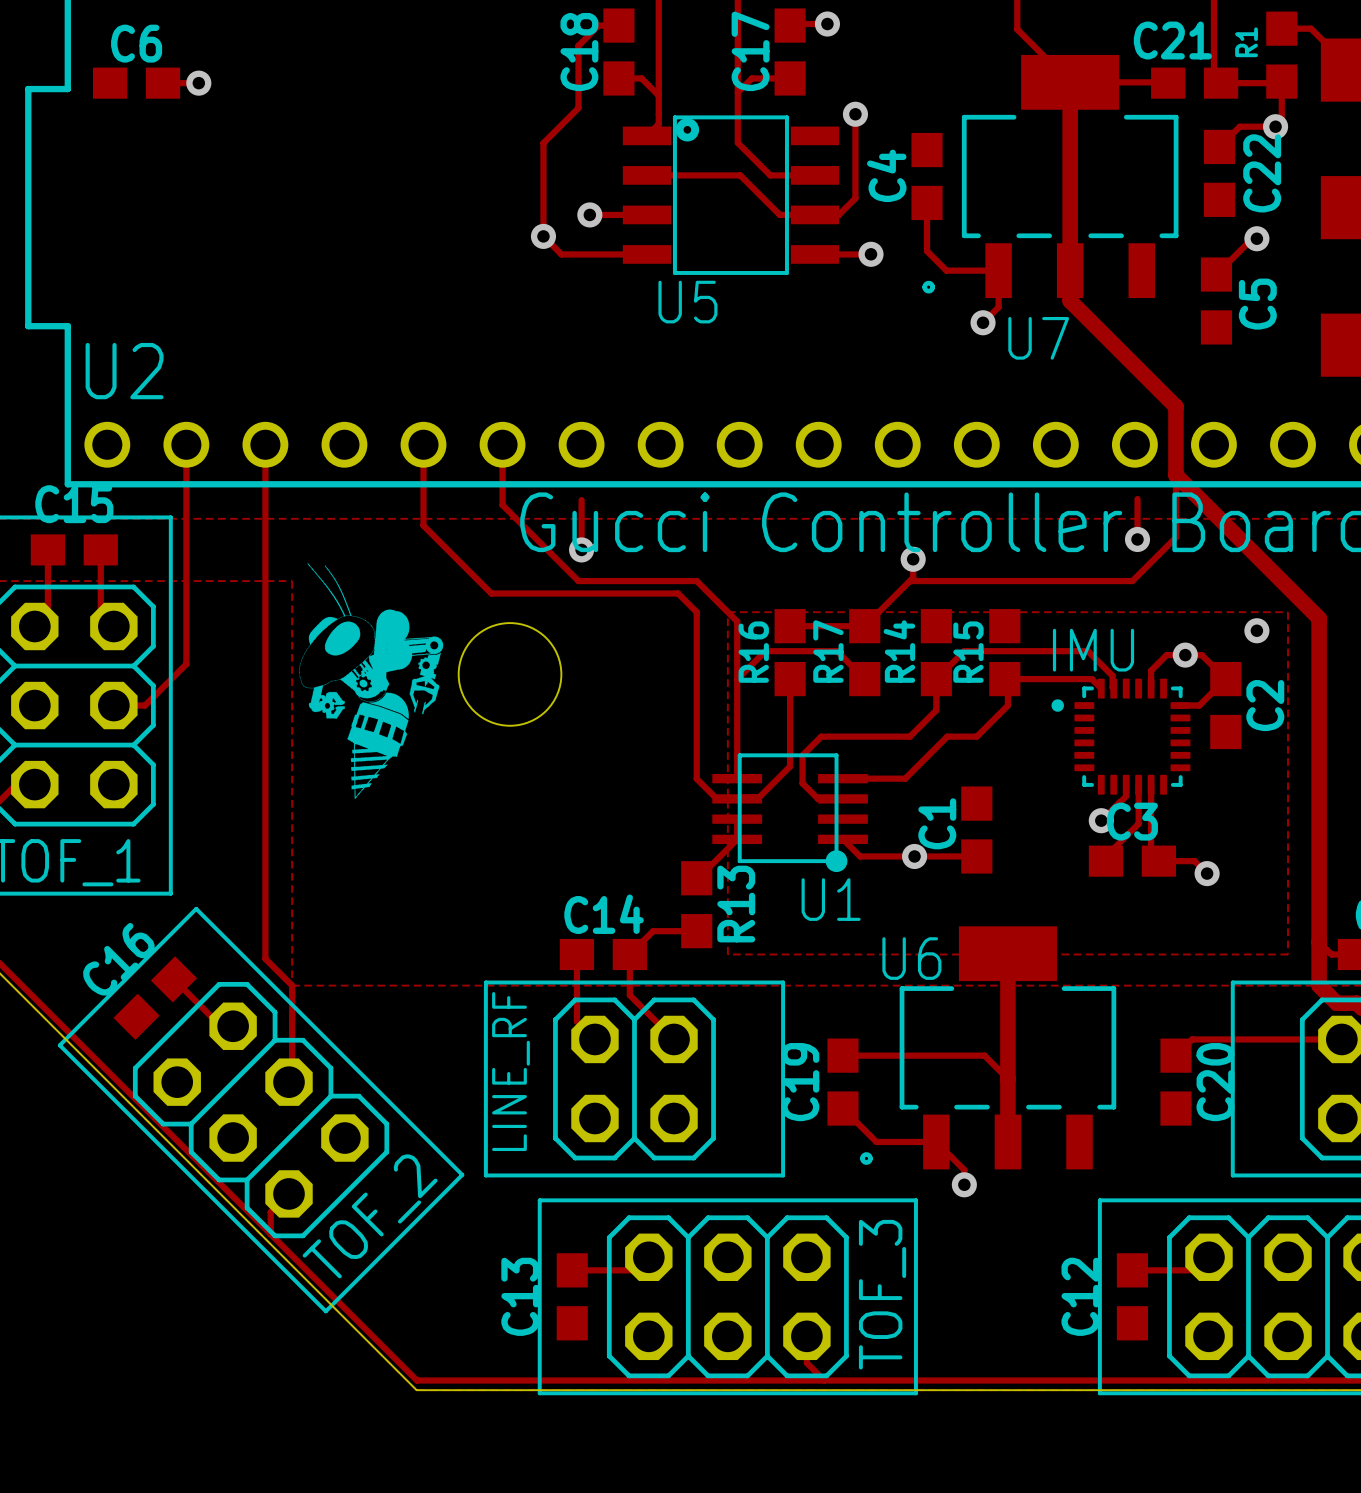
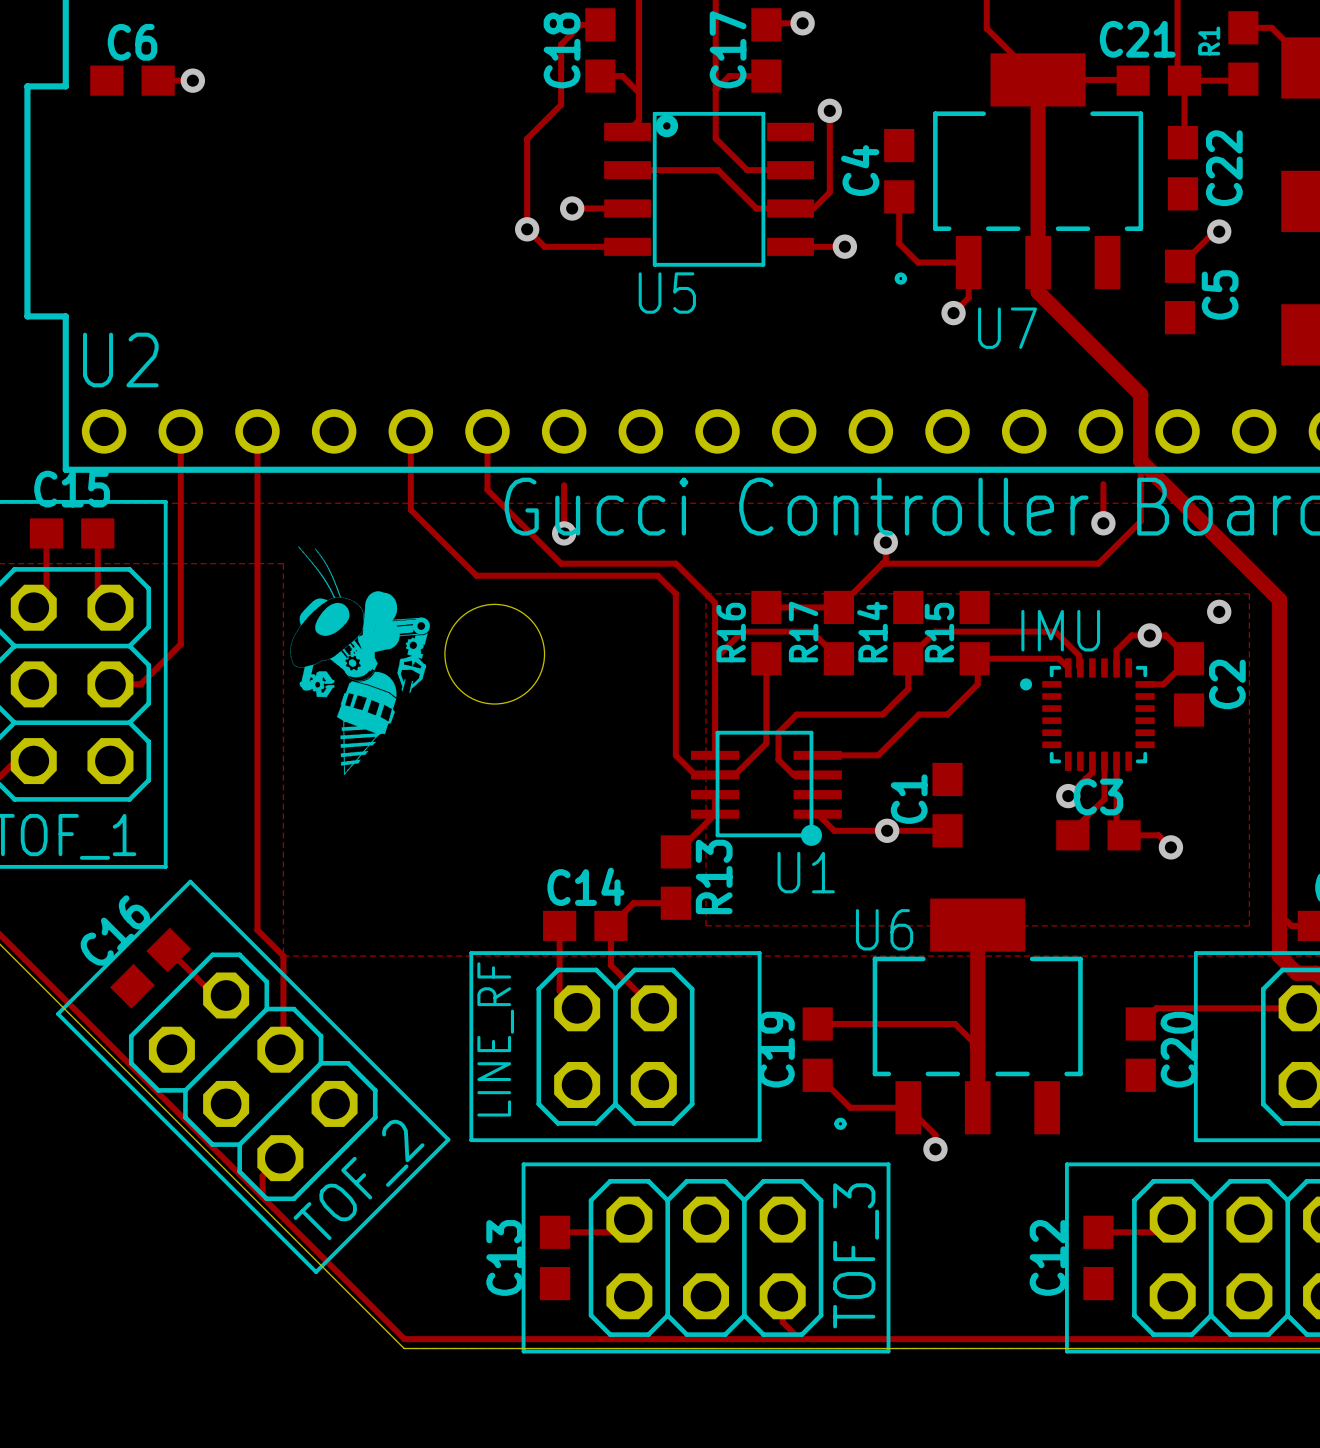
track: (1281, 81) (1281, 120) (1275, 126) (1239, 126) (1221, 145) -> (1184, 80) (1184, 141)
via: (1275, 126) -> none

